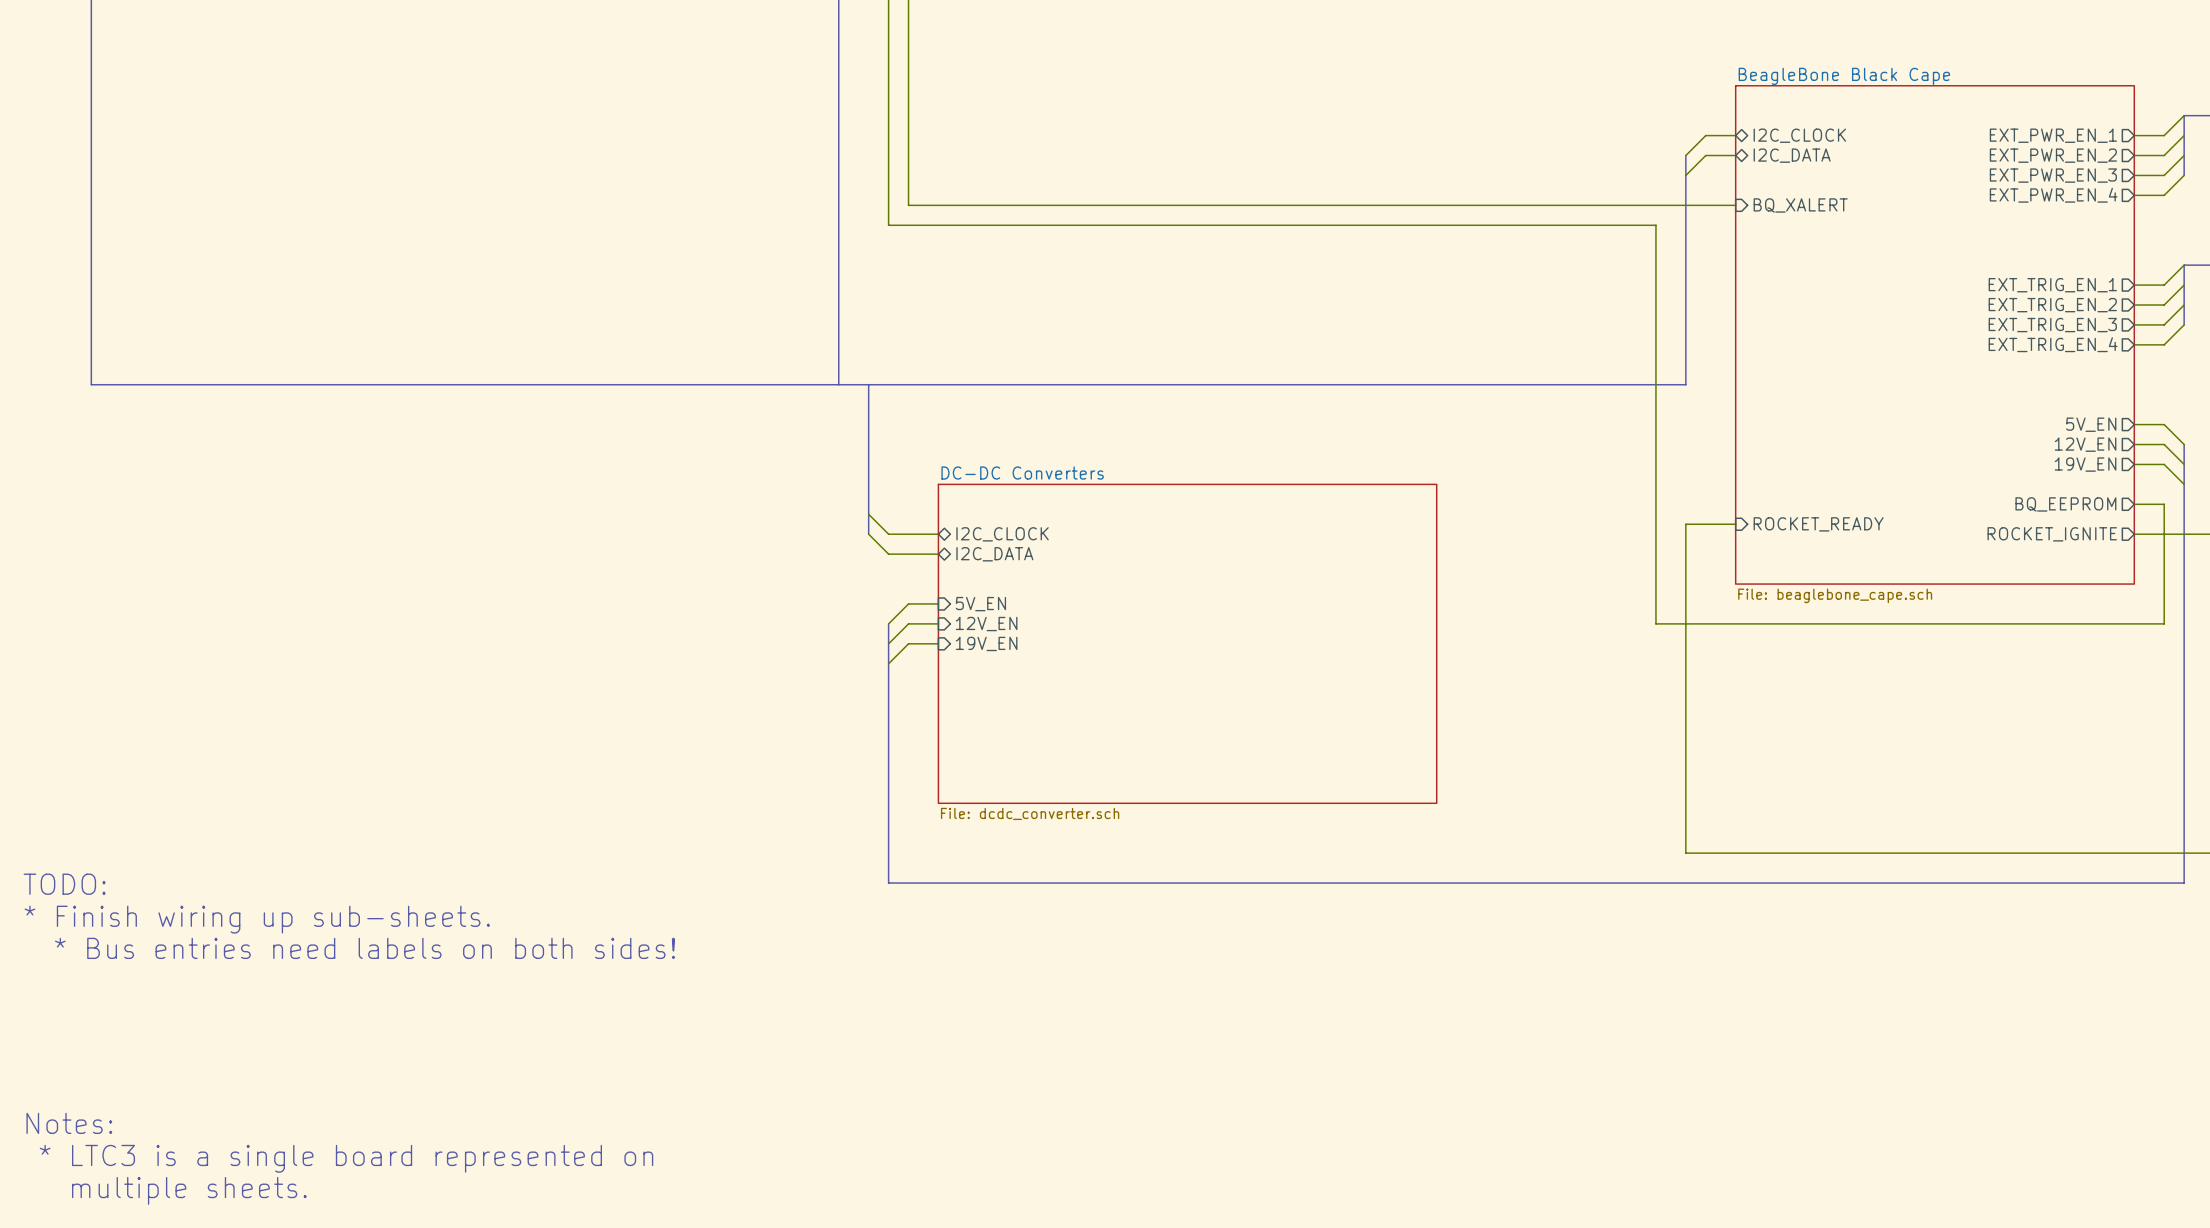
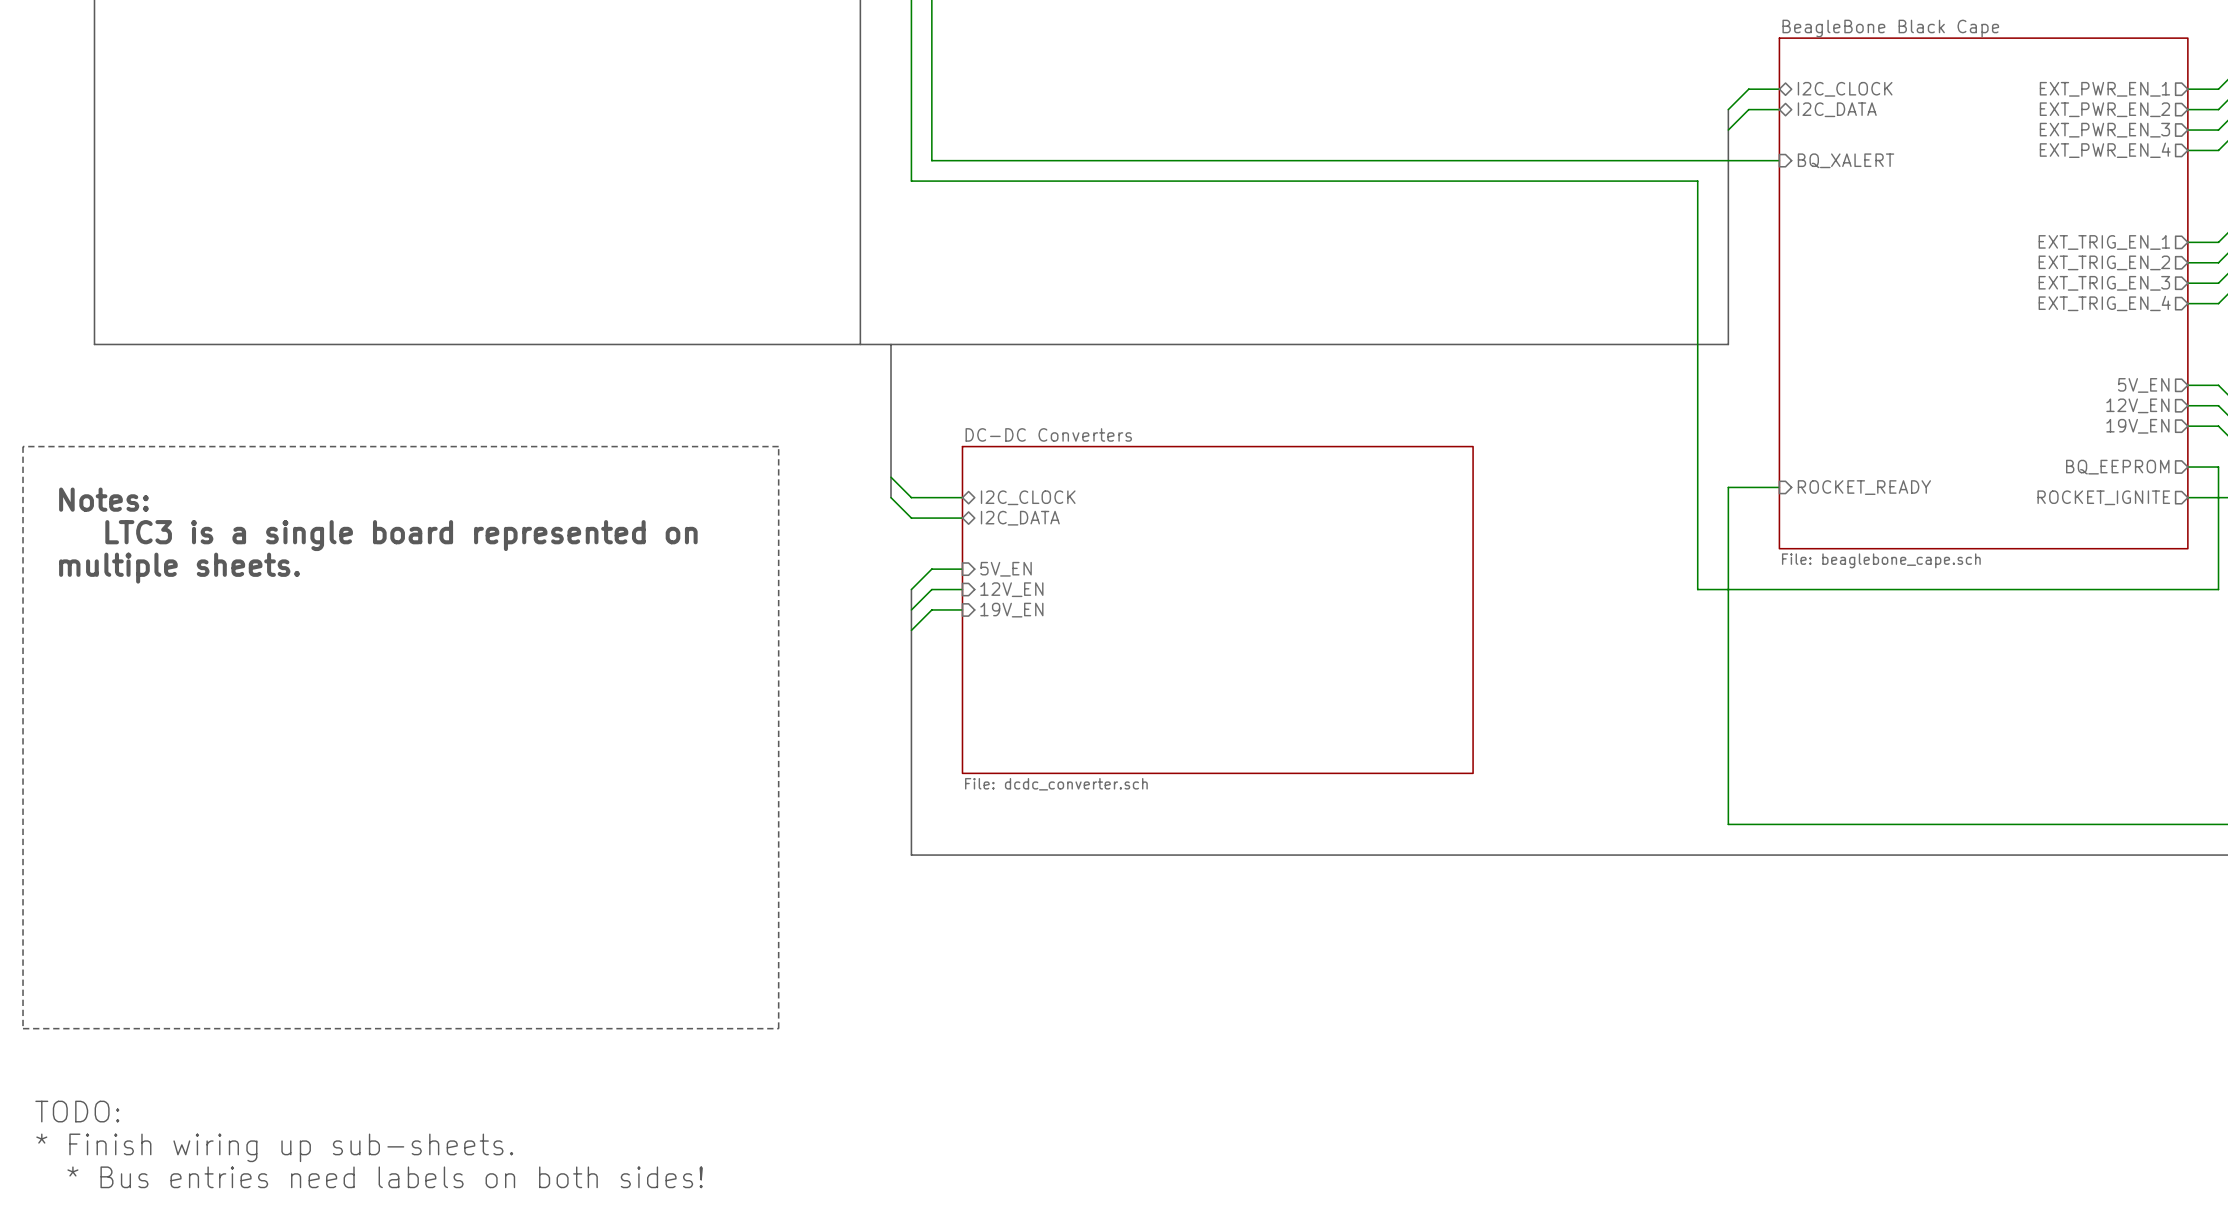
line: none -> (23, 446) (23, 1028) (778, 1028) (778, 446) (23, 446)
text: none -> Notes: (103, 499)
text: none -> LTC3 is a single board represented on (401, 535)
text: none -> multiple sheets. (179, 568)
text: TODO: (64, 884) -> none
text: * Finish wiring up sub-sheets. (257, 919) -> none
text: * Bus entries need labels on both sides! (364, 948) -> none
text: Notes: (69, 1123) -> none
text: none -> TODO: (77, 1111)
text: * LTC3 is a single board represented on (346, 1158) -> none
text: none -> * Finish wiring up sub-sheets. (274, 1147)
text: multiple sheets. (189, 1190) -> none
text: none -> * Bus entries need labels on both sides! (385, 1177)

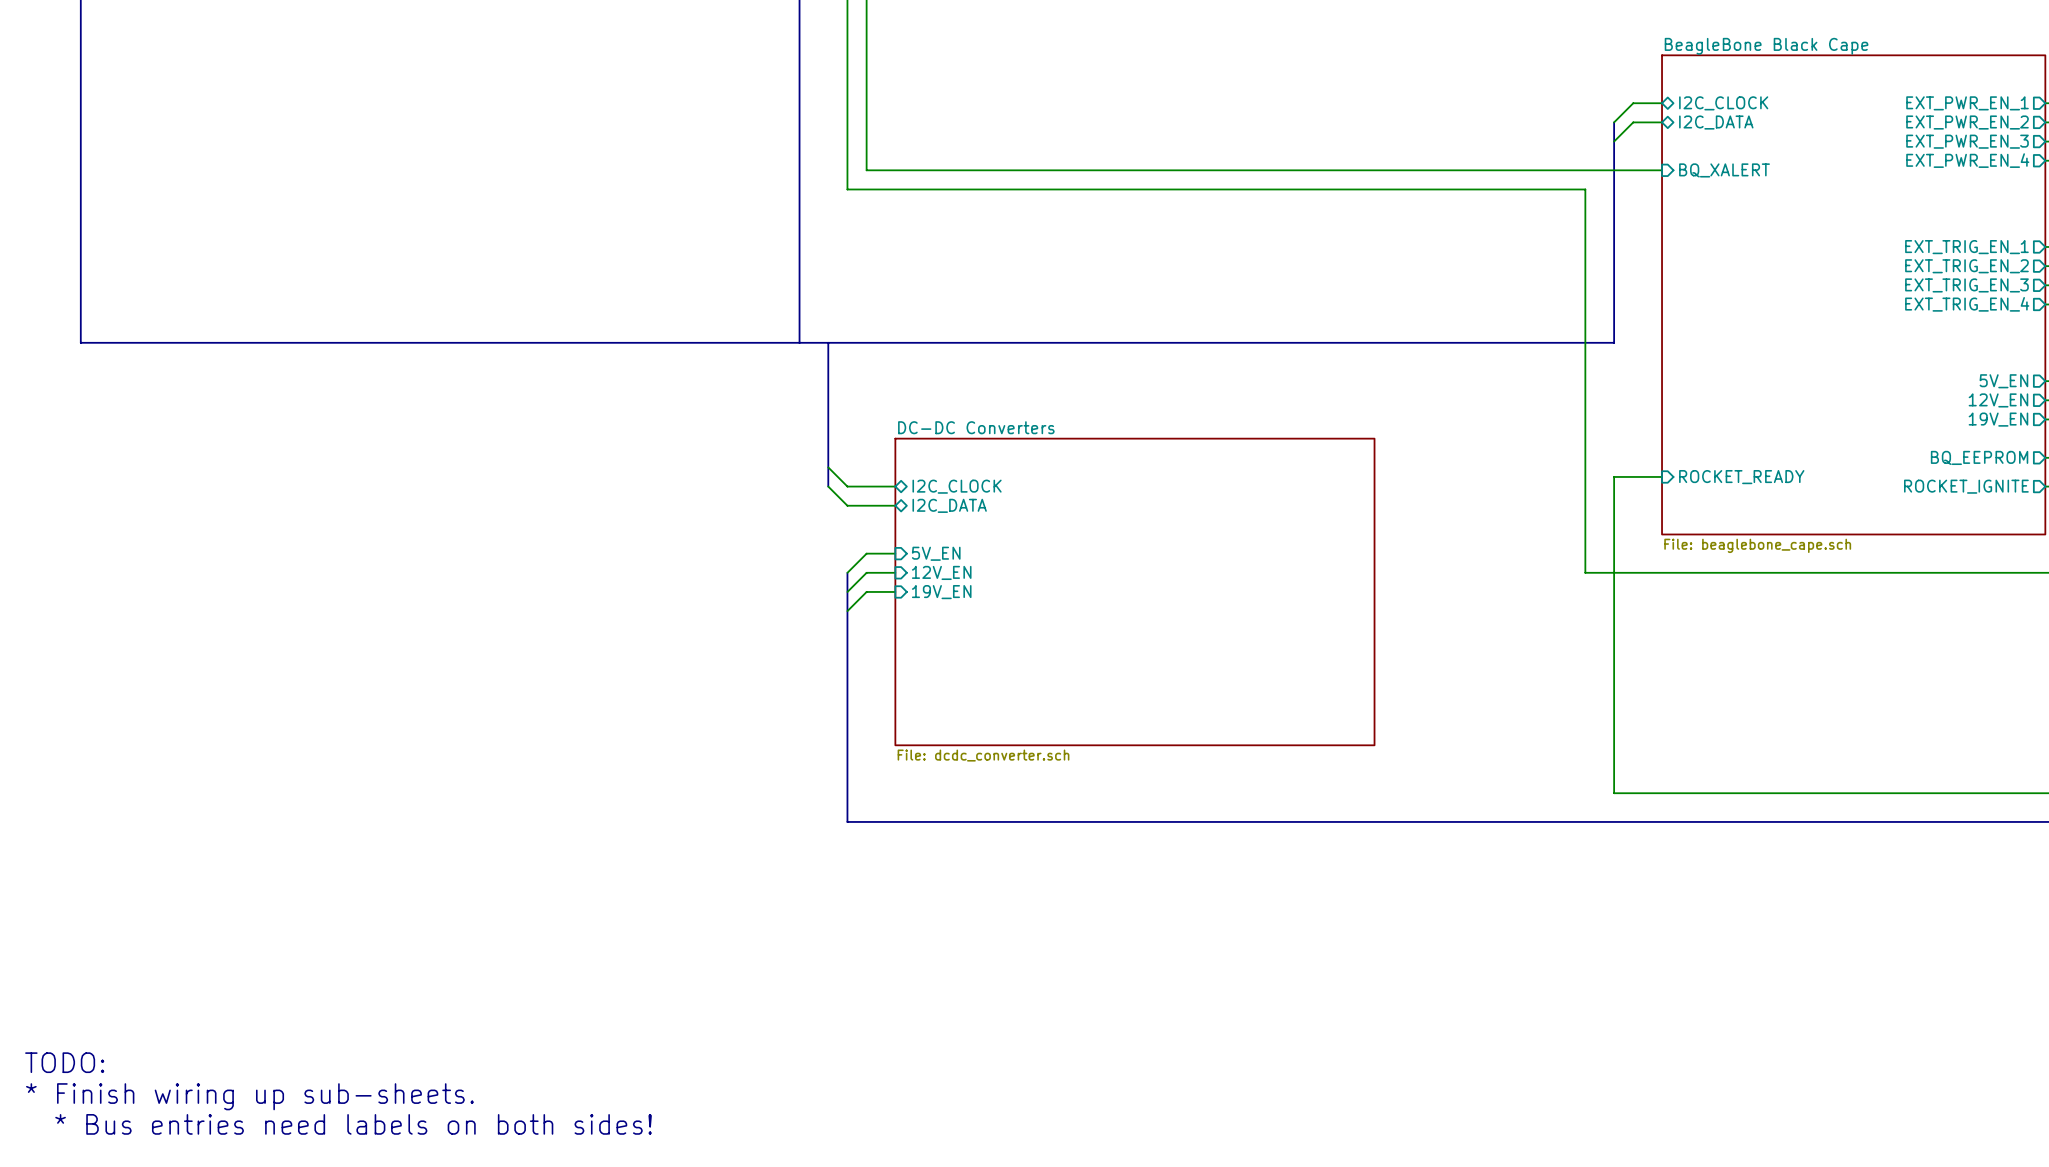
line: (23, 446) (23, 1028) (778, 1028) (778, 446) (23, 446) -> none
text: Notes: (103, 499) -> none
text: LTC3 is a single board represented on (401, 535) -> none
text: multiple sheets. (179, 568) -> none

